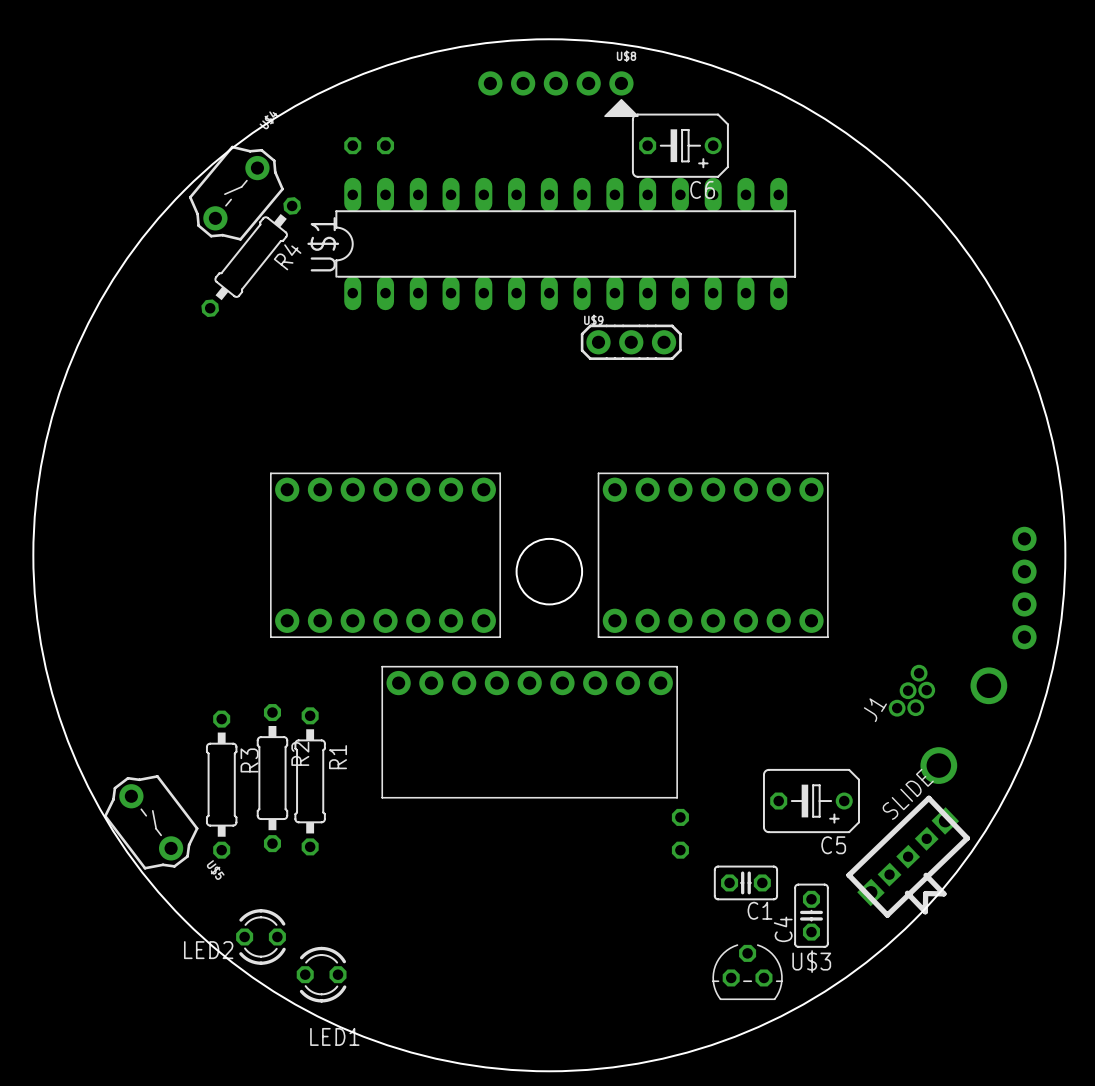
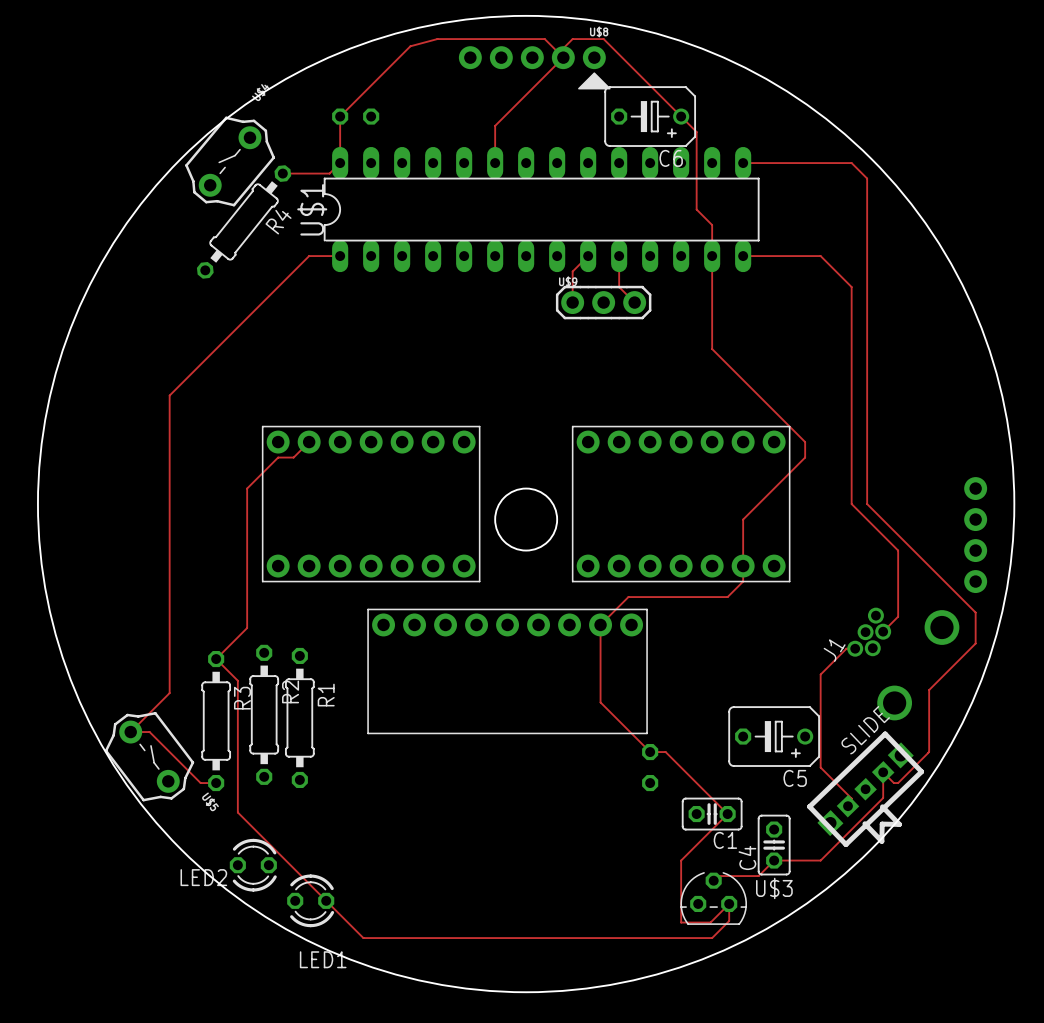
track: none -> (563, 57) (563, 48) (572, 39) (603, 39) (696, 132) (696, 209) (712, 225) (712, 349) (805, 442) (805, 457) (743, 519) (743, 581) (727, 597) (628, 597) (600, 624) (600, 702) (650, 752) (665, 752) (727, 814) (681, 860) (681, 922) (710, 922) (729, 903) (729, 921) (712, 938) (363, 938) (237, 812) (237, 680) (216, 659) (247, 628) (247, 488) (278, 457) (293, 457) (309, 442)
track: none -> (563, 57) (495, 125) (495, 163)
track: none -> (563, 57) (544, 39) (437, 39) (410, 46) (340, 116) (340, 163) (329, 173) (282, 173)
track: none -> (743, 163) (851, 163) (867, 178) (867, 504) (975, 612) (975, 643) (929, 690) (928, 753) (898, 783) (893, 783) (883, 772) (883, 798) (820, 860) (774, 860) (758, 876) (718, 876) (713, 880)
track: none -> (340, 256) (309, 256) (169, 395) (169, 693) (130, 732) (149, 732) (200, 783) (216, 783)
track: none -> (588, 256) (572, 271) (572, 302)
track: none -> (619, 256) (619, 287) (634, 302)
track: none -> (743, 256) (820, 256) (851, 287) (851, 504) (898, 550) (898, 616) (883, 631)
track: none -> (856, 648) (846, 648) (820, 674) (820, 767) (851, 798) (851, 802) (848, 806)

